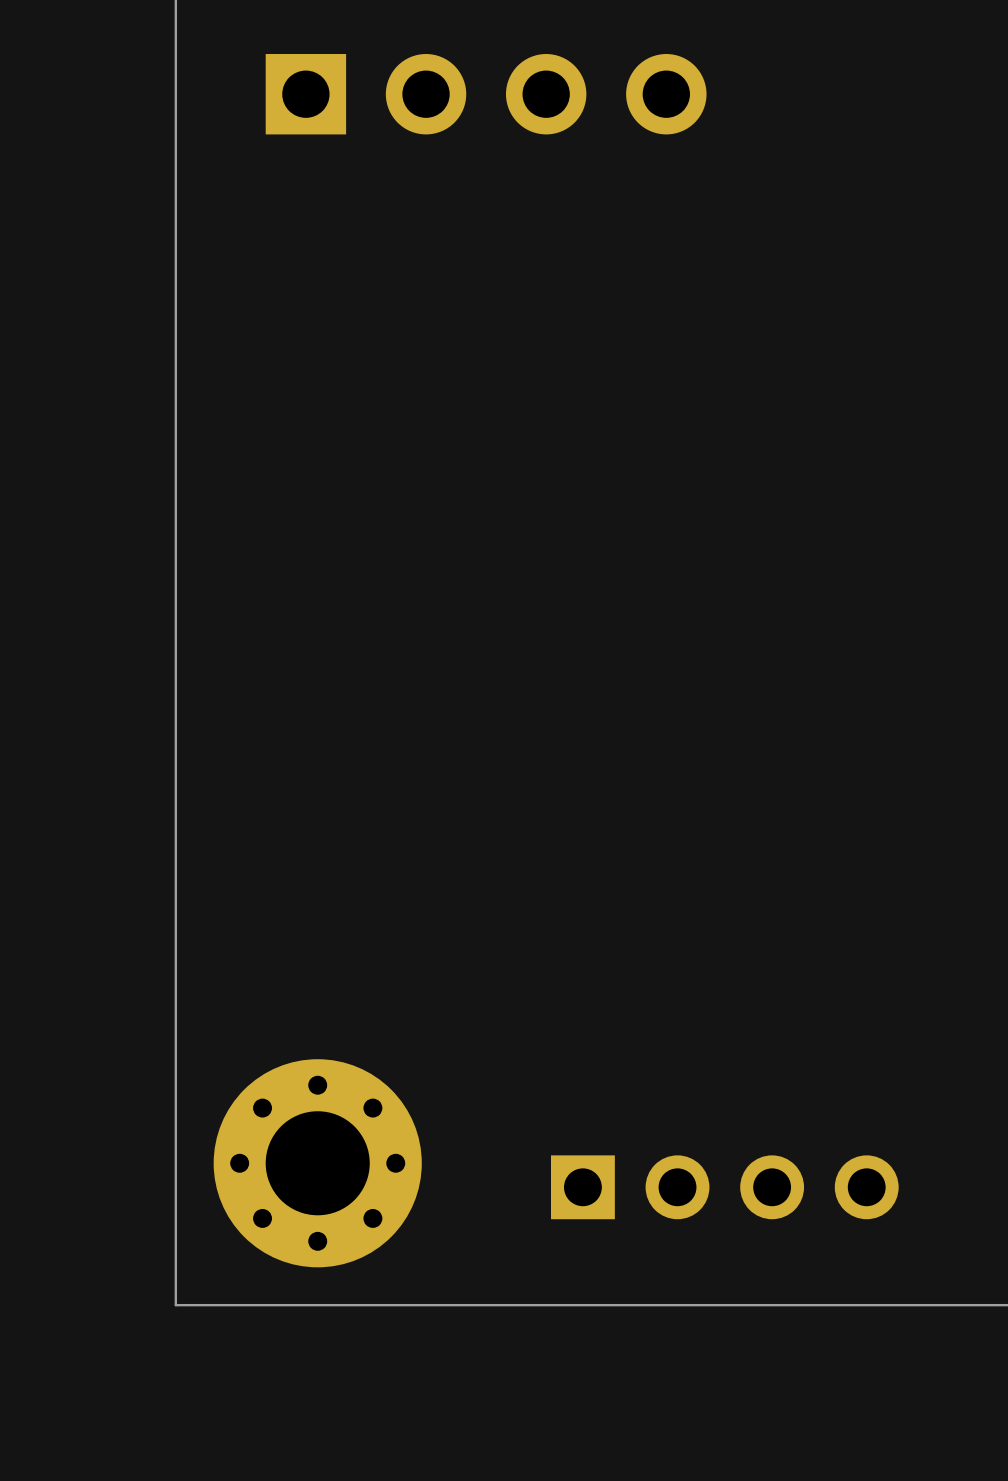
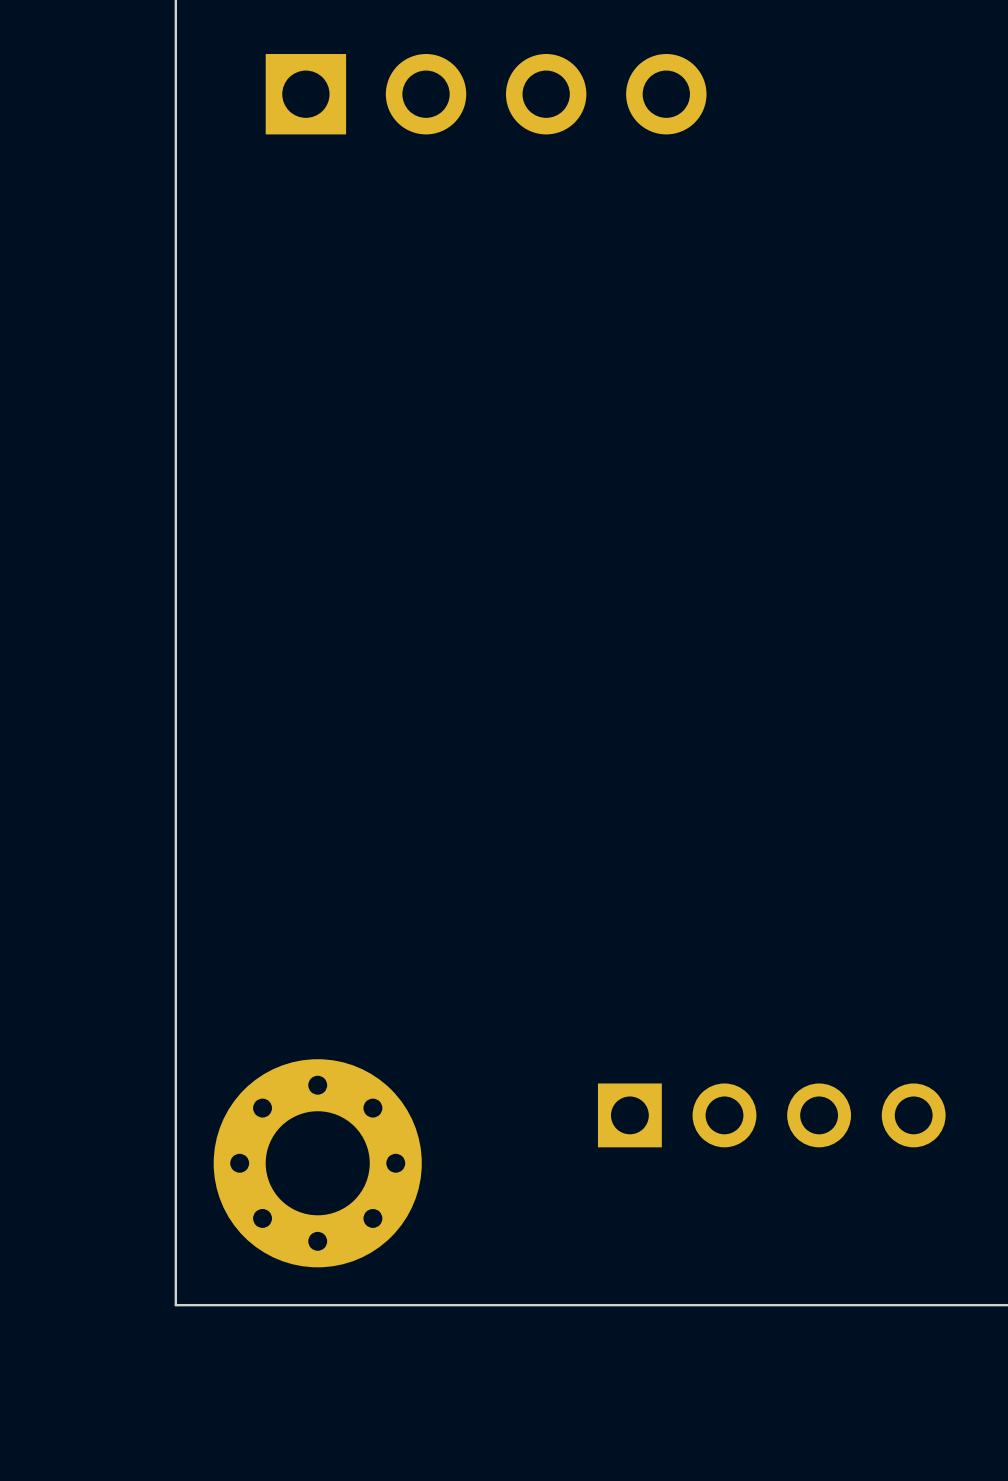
part position: (724, 1187) -> (771, 1115)

